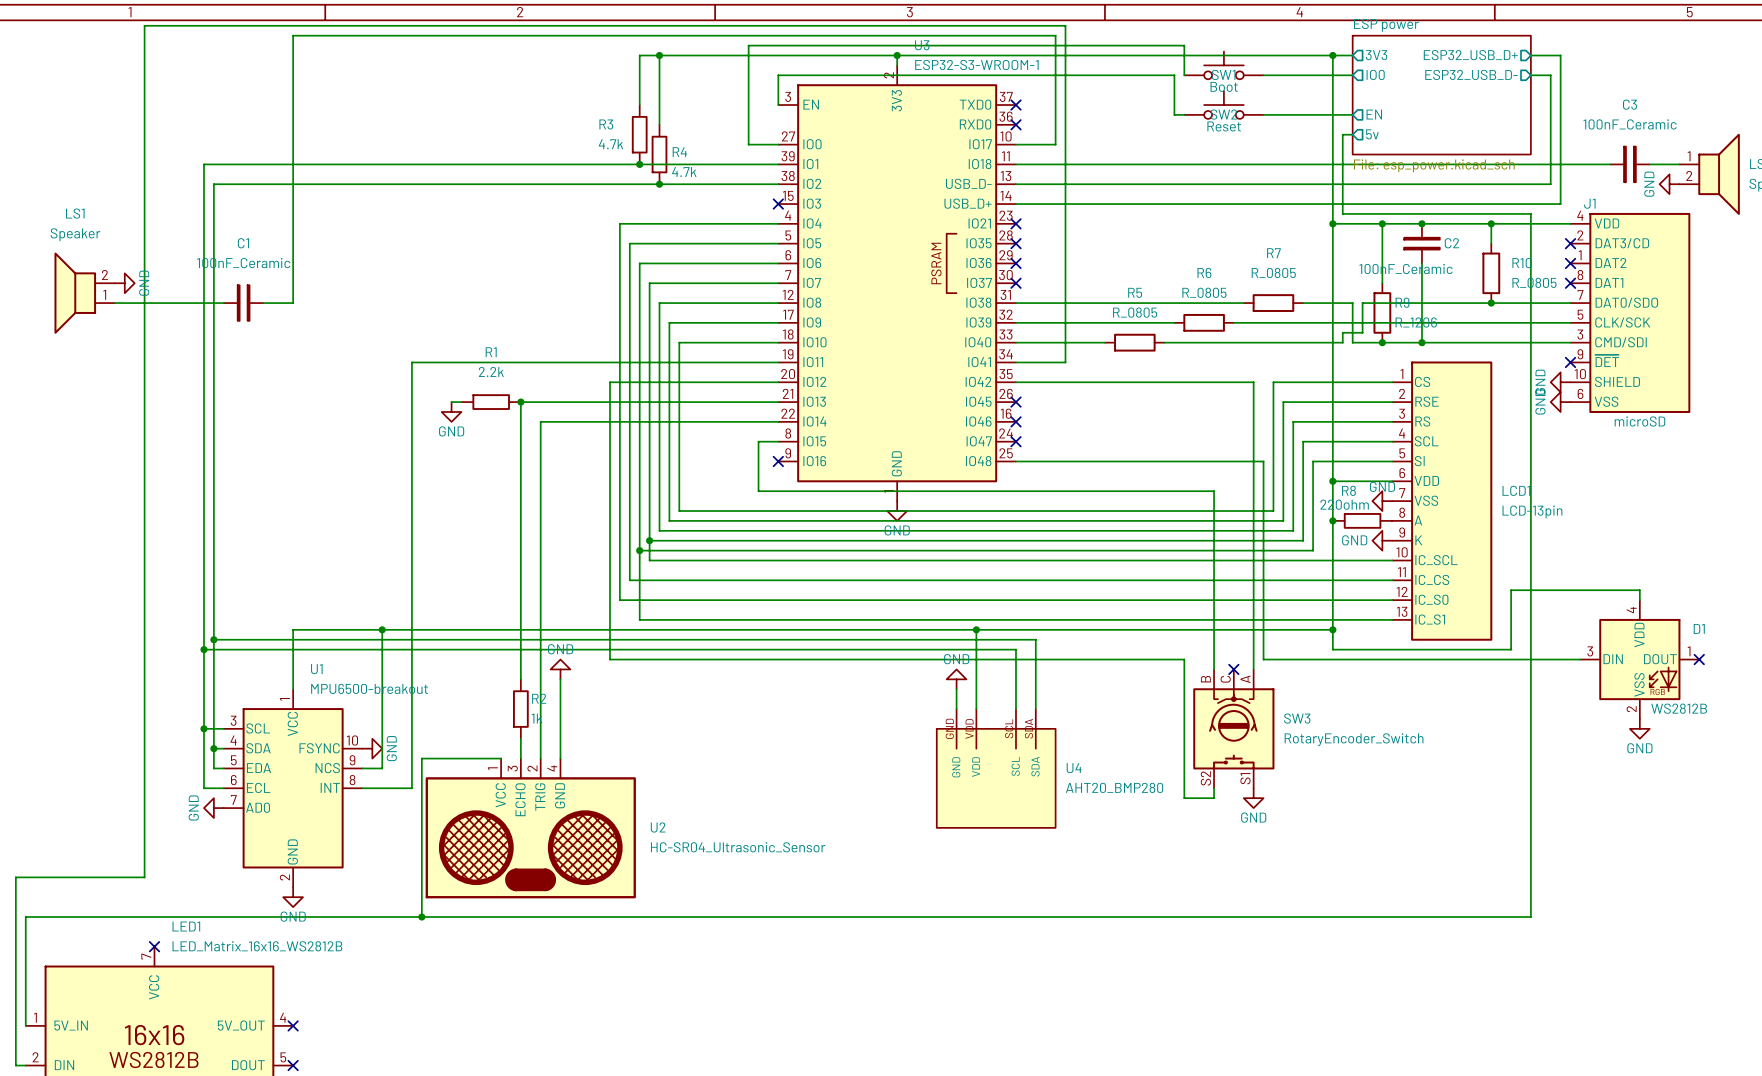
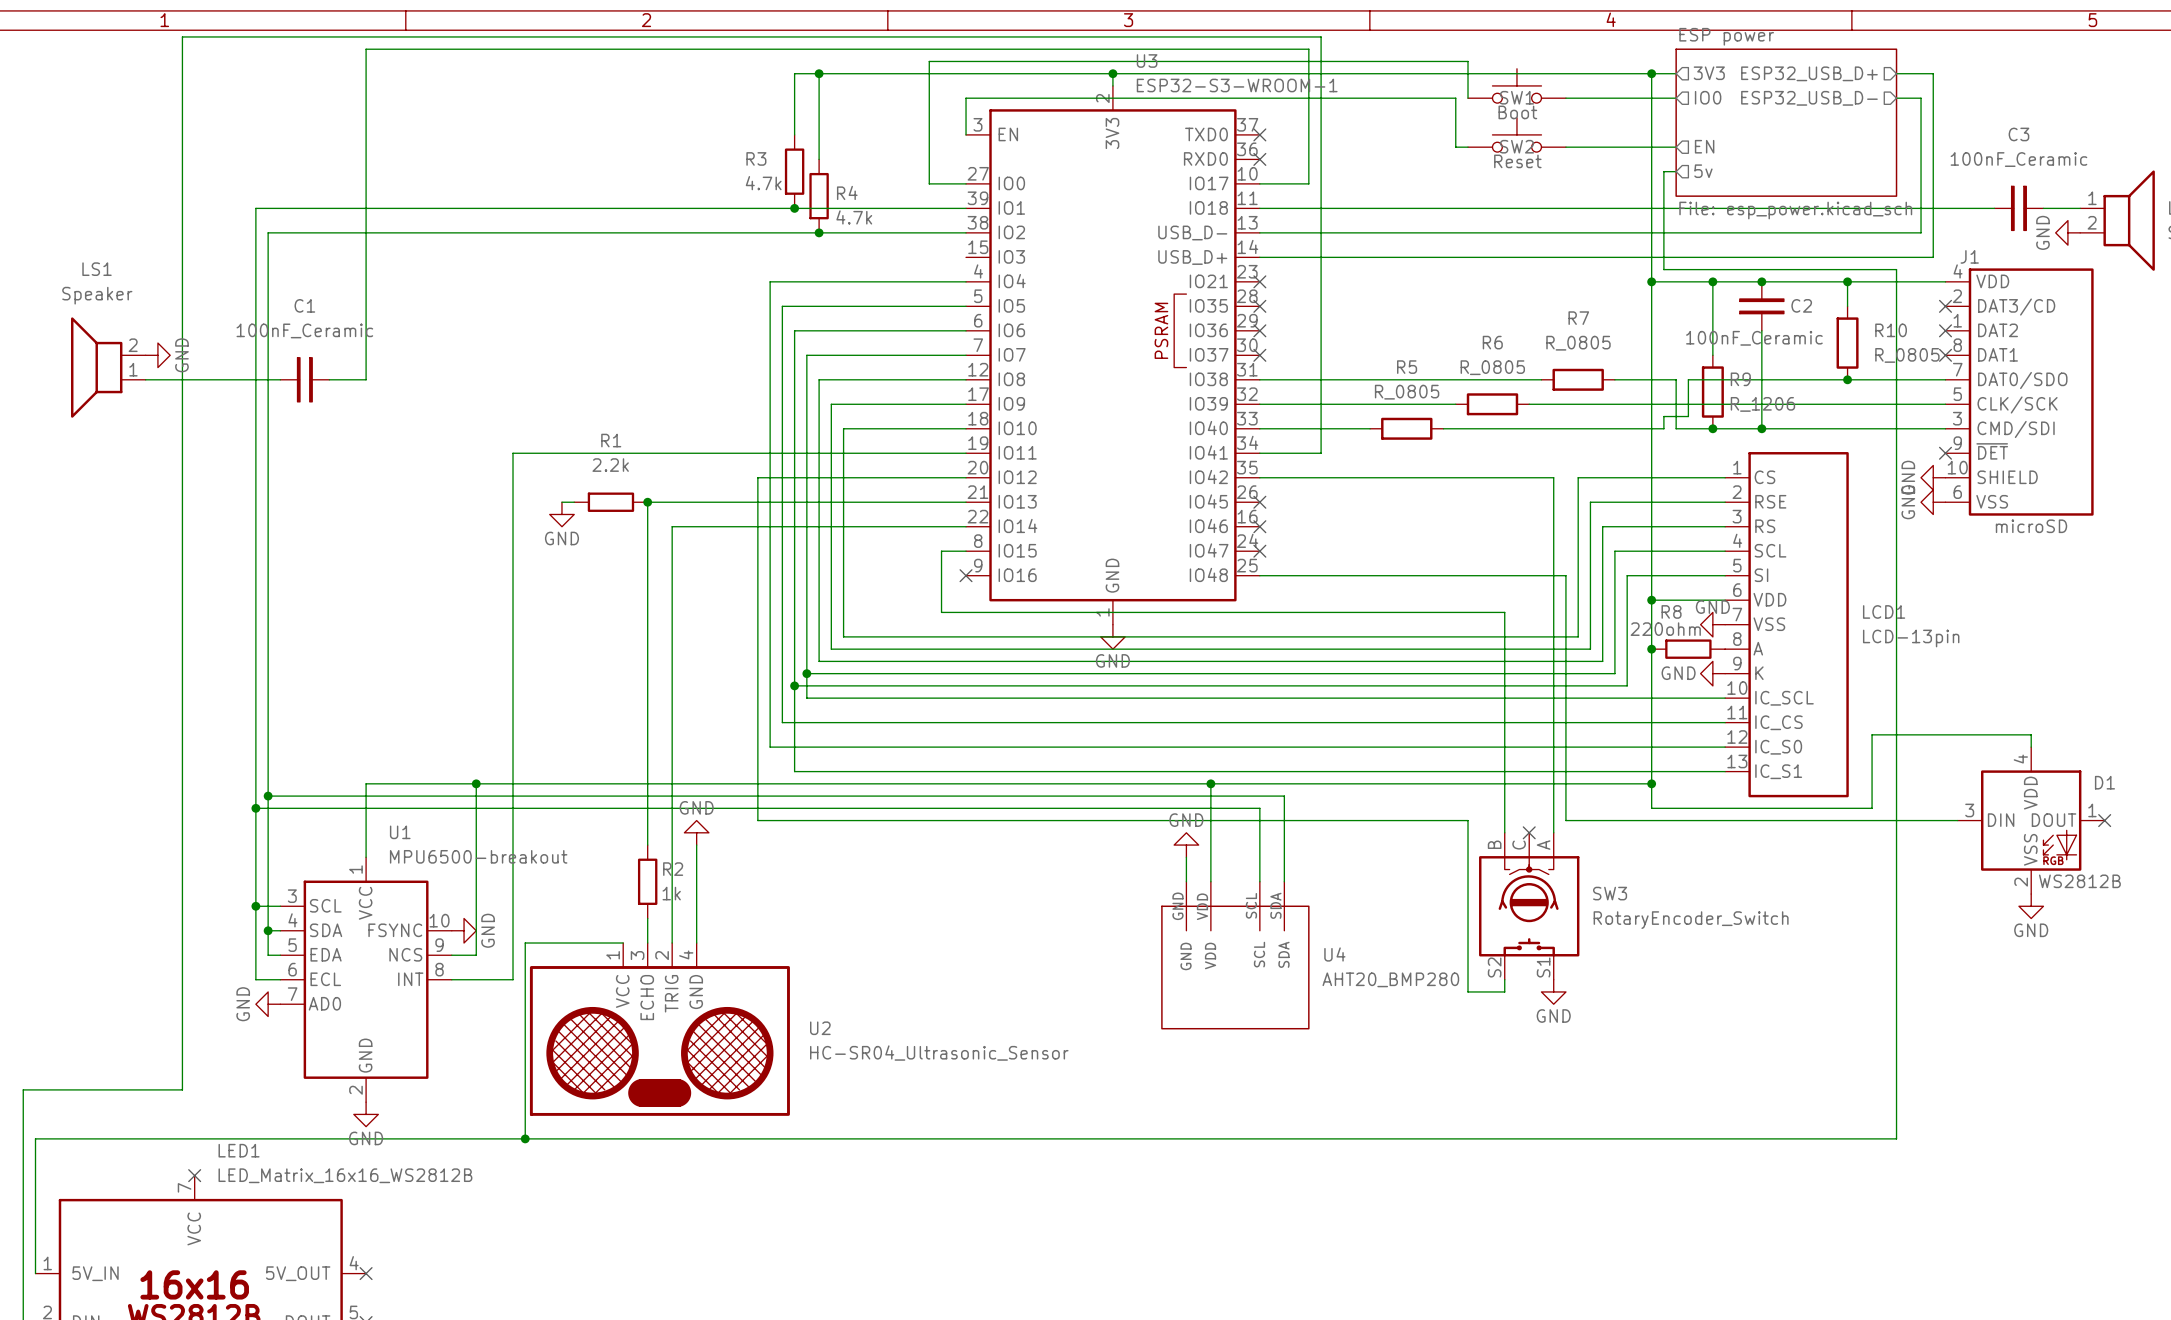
no-connect mark: (778, 204) -> none

